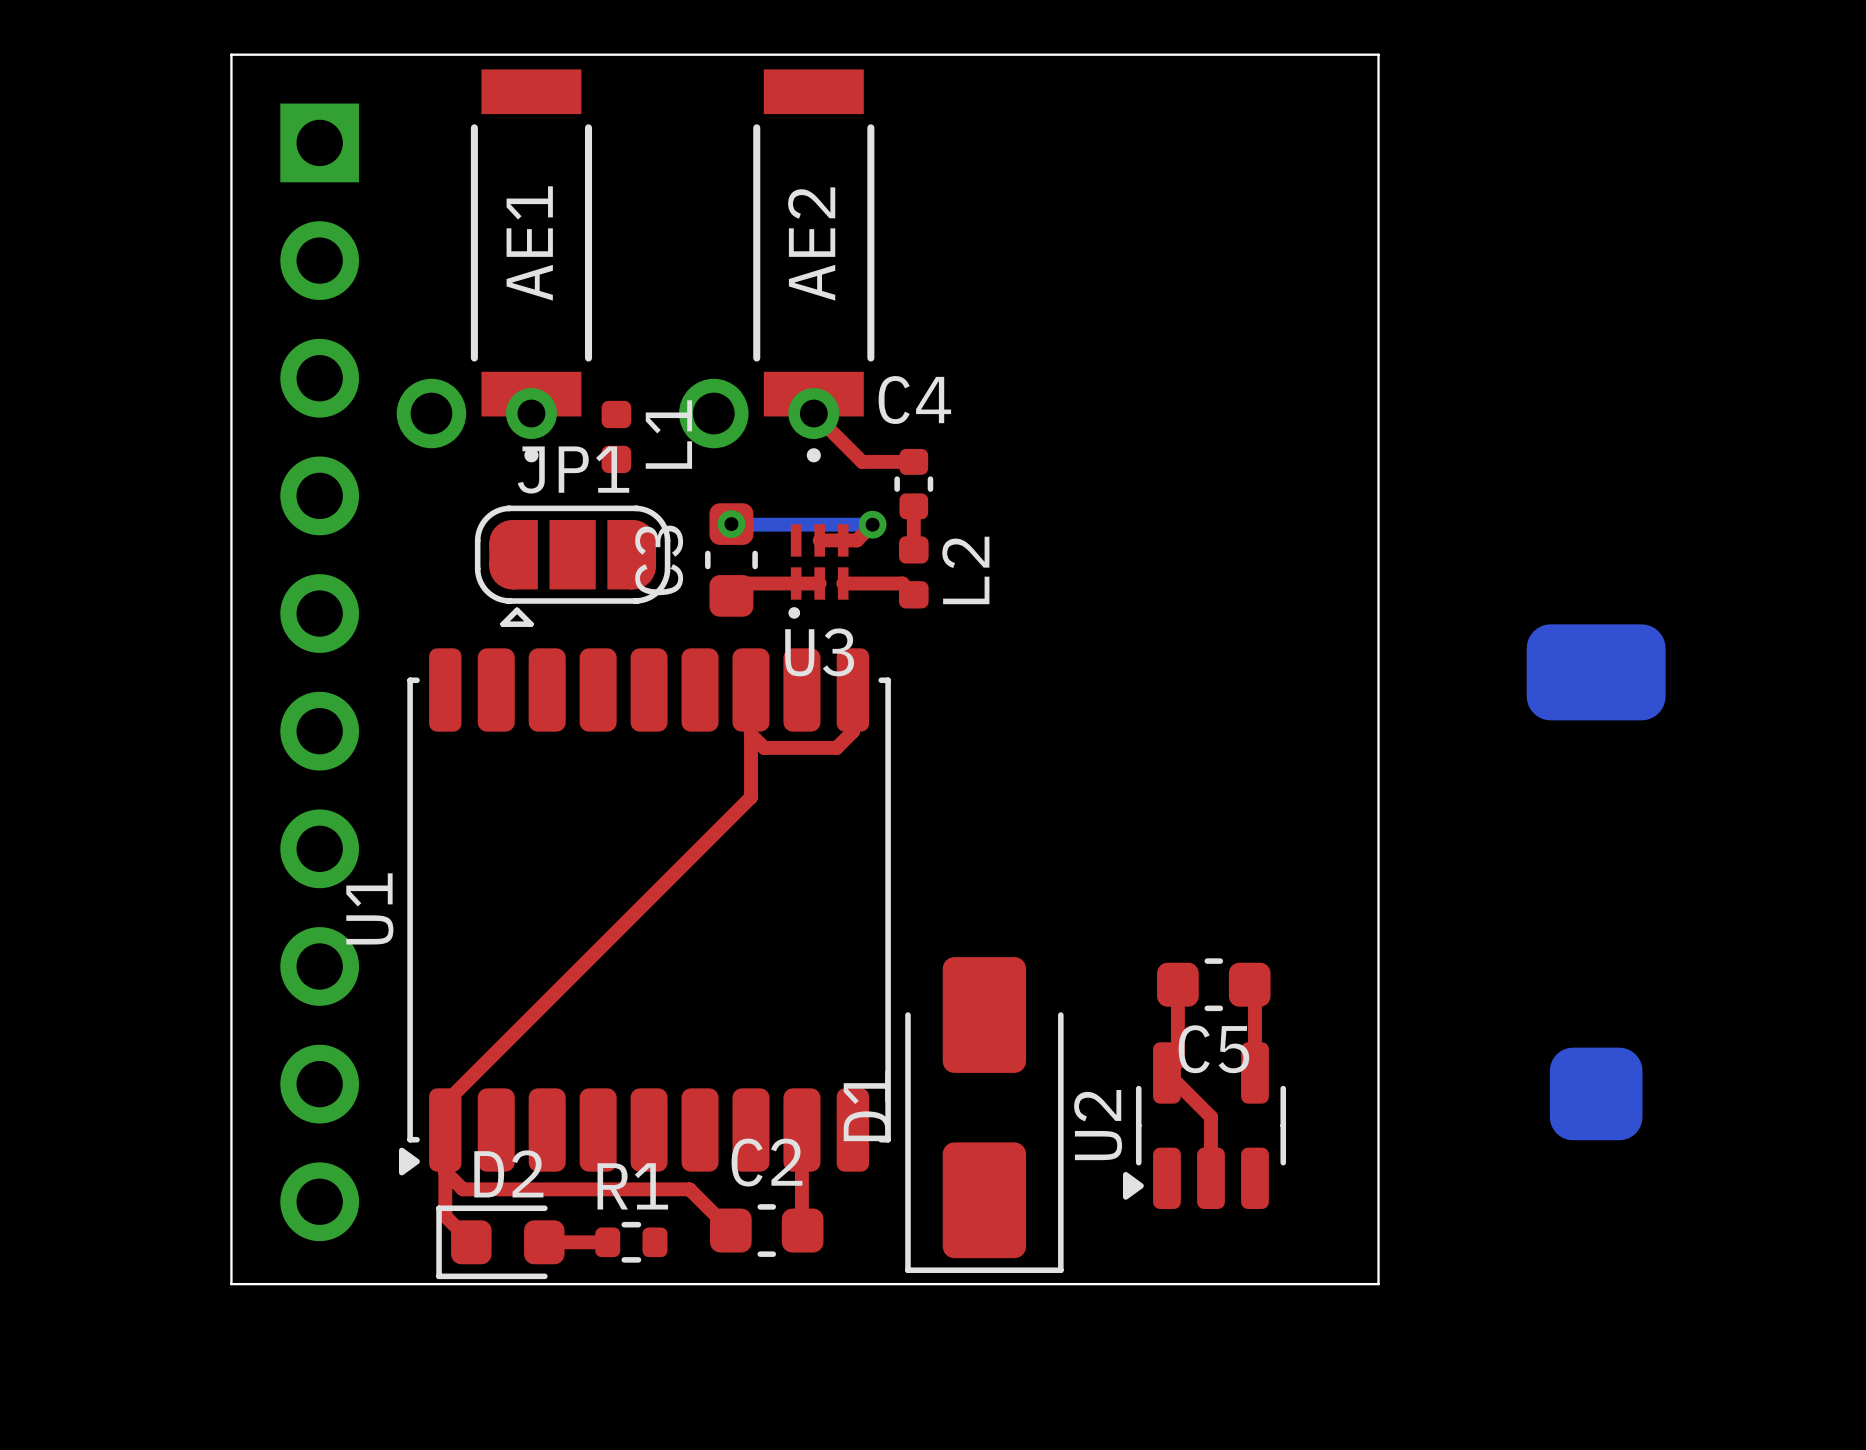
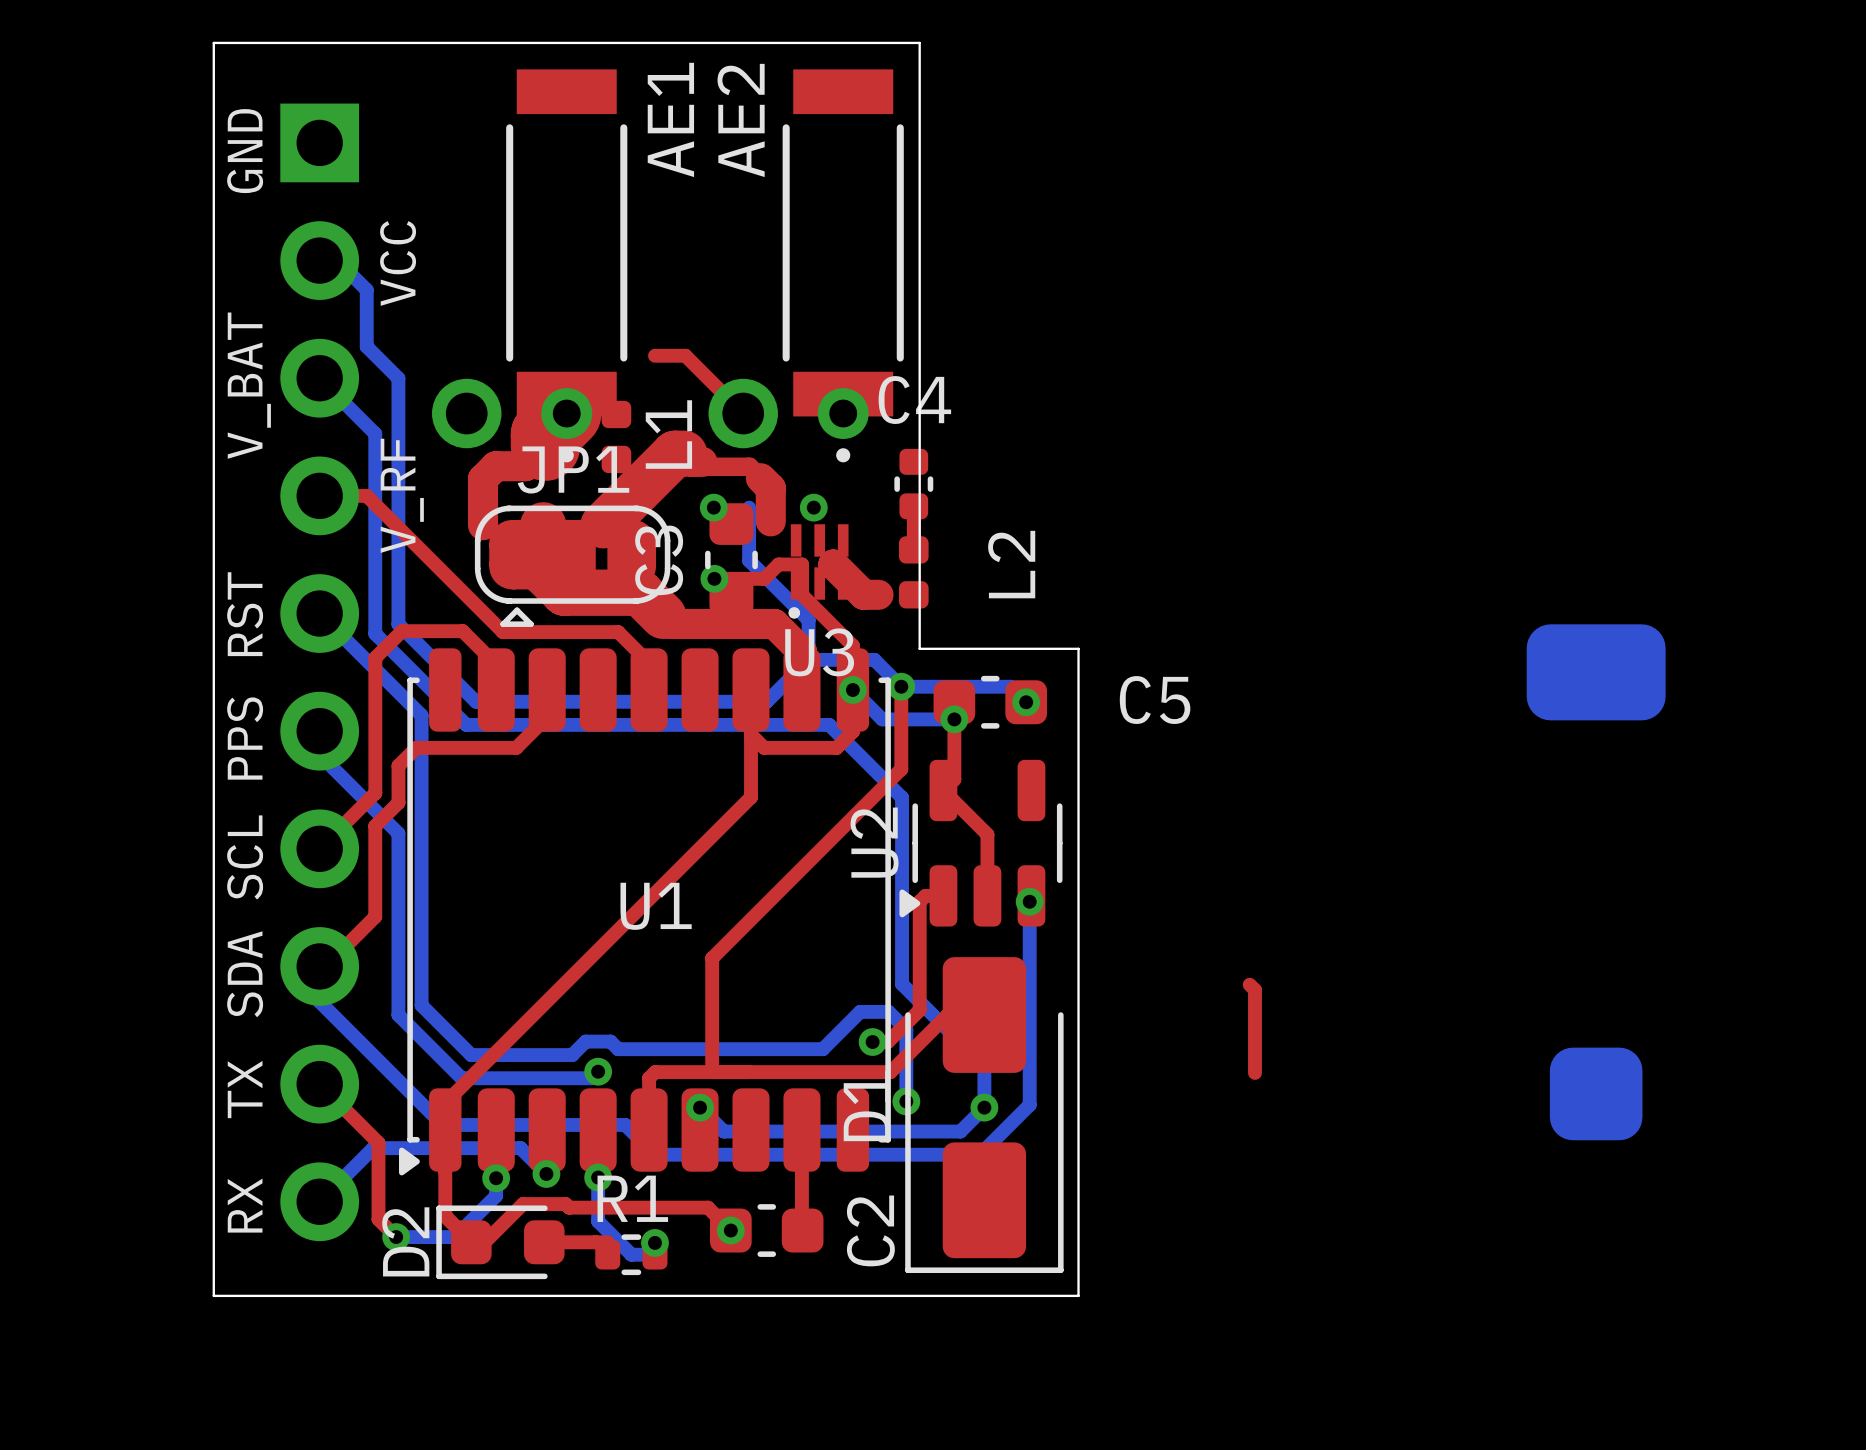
board edge: (231, 54) (1378, 54) (1378, 1284) (231, 1284) (231, 54) -> (213, 42) (213, 1295) (1078, 1295) (1078, 648) (919, 648) (919, 42) (213, 42)
text: none -> GND (245, 151)
AE1 name position: AE1 (529, 243) -> AE1 (670, 119)
AE2 name position: AE2 (811, 243) -> AE2 (741, 120)
bottom track: none -> (319, 260) (337, 260) (366, 289) (366, 346) (398, 378) (398, 624) (475, 701) (766, 701) (808, 659)
text: none -> VCC (398, 263)
AE1 position: (494, 265) -> (529, 265)
AE2 position: (776, 265) -> (806, 265)
top track: none -> (654, 355) (685, 355) (743, 413)
bottom track: none -> (319, 378) (375, 433) (375, 633) (466, 724) (829, 724) (902, 797) (902, 984) (984, 1066) (984, 1107) (960, 1131) (723, 1131) (700, 1107)
text: none -> V_BAT (249, 385)
top track: none -> (573, 400) (566, 394) (566, 413) (545, 434) (545, 446) (525, 466) (495, 466) (483, 478) (483, 525)
top track: (813, 413) (862, 461) (913, 461) -> none
top track: none -> (690, 454) (702, 466) (749, 466) (770, 488) (770, 521)
top track: none -> (702, 461) (692, 461) (684, 453) (674, 453) (603, 525)
top track: none -> (319, 495) (366, 495) (502, 632) (618, 632) (649, 662) (649, 689)
text: none -> V_RF (402, 495)
bottom track: none -> (749, 507) (749, 560) (808, 620) (808, 659)
via: none -> (813, 507)
via position: (731, 524) -> (713, 507)
bottom track: (732, 524) (872, 524) -> none
top track: (872, 524) (856, 540) (819, 540) -> none
via: (872, 524) -> none
top track: none -> (543, 525) (543, 571) (564, 592) (640, 592) (671, 623) (774, 623) (801, 651) (801, 689) (801, 656)
top track: none -> (833, 564) (863, 594) (878, 594)
L2 name position: L2 (965, 570) -> L2 (1011, 564)
top track: none -> (713, 578) (764, 578) (778, 564) (802, 564) (802, 594) (852, 645) (852, 689)
via: none -> (714, 578)
top track: (819, 583) (743, 583) (731, 595) -> none
top track: (843, 583) (902, 583) (913, 594) -> none
bottom track: none -> (319, 613) (421, 715) (421, 1005) (471, 1055) (572, 1055) (585, 1041) (610, 1041) (618, 1049) (822, 1049) (860, 1011) (888, 1011) (906, 1029) (906, 1101)
text: none -> RST (245, 614)
bottom track: none -> (808, 659) (874, 659) (901, 686) (1010, 686) (1026, 702)
top track: none -> (901, 686) (901, 769) (712, 958) (712, 1072)
via: none -> (901, 686)
top track: none -> (496, 689) (496, 664) (462, 631) (402, 631) (375, 657) (375, 793) (319, 848)
top track: none -> (547, 689) (547, 717) (516, 747) (416, 747) (398, 765) (398, 802) (375, 825) (375, 916) (325, 966) (319, 966)
bottom track: none -> (852, 689) (882, 719) (954, 719)
via: none -> (852, 689)
via: none -> (1026, 702)
via: none -> (954, 719)
bottom track: none -> (319, 731) (319, 754) (398, 833) (398, 1015) (461, 1078) (591, 1078) (598, 1071)
text: none -> PPS (245, 738)
text: none -> SCL (245, 857)
top track: none -> (943, 895) (925, 895) (919, 901) (919, 1010) (887, 1042) (872, 1042)
bottom track: none -> (1029, 901) (1029, 1104) (979, 1154) (654, 1154) (625, 1124) (442, 1124) (319, 1001) (319, 966)
via: none -> (1029, 901)
U1 name rotation: 0° (369, 908) -> 90° clockwise (656, 906)
U1 name position: U1 (369, 908) -> U1 (656, 906)
text: none -> SDA (245, 974)
top track: (1177, 984) (1177, 1062) (1166, 1072) (1210, 1116) (1210, 1178) -> (954, 702) (954, 779) (943, 790) (987, 834) (987, 895)
C5 position: (1213, 984) -> (990, 702)
top track: none -> (984, 1015) (947, 1015) (890, 1072) (655, 1072) (649, 1078) (649, 1130)
via: none -> (872, 1042)
C5 name position: C5 (1213, 1049) -> C5 (1155, 700)
via: none -> (598, 1071)
top track: none -> (319, 1084) (378, 1142) (378, 1219) (396, 1237)
text: none -> TX (245, 1089)
via: none -> (906, 1101)
via: none -> (700, 1107)
via: none -> (984, 1107)
U2 position: (1204, 1125) -> (980, 843)
C2 name rotation: 0° (766, 1162) -> 90° counterclockwise (870, 1230)
C2 name position: C2 (766, 1162) -> C2 (870, 1230)
top track: (445, 1171) (462, 1189) (689, 1189) (707, 1207) -> (445, 1216) (471, 1242) (484, 1242) (522, 1204) (565, 1204) (569, 1207) (707, 1207)
D2 name rotation: 0° (508, 1173) -> 90° counterclockwise (405, 1241)
D2 name position: D2 (508, 1173) -> D2 (405, 1241)
bottom track: none -> (546, 1173) (520, 1148) (373, 1148) (319, 1201)
via: none -> (546, 1173)
bottom track: none -> (598, 1177) (598, 1221) (631, 1254) (654, 1254)
via: none -> (598, 1177)
bottom track: none -> (496, 1178) (496, 1195) (454, 1237) (396, 1237)
via: none -> (496, 1178)
text: none -> RX (245, 1205)
via: none -> (730, 1230)
via: none -> (396, 1237)
R1 position: (631, 1242) -> (631, 1254)
via: none -> (654, 1242)

